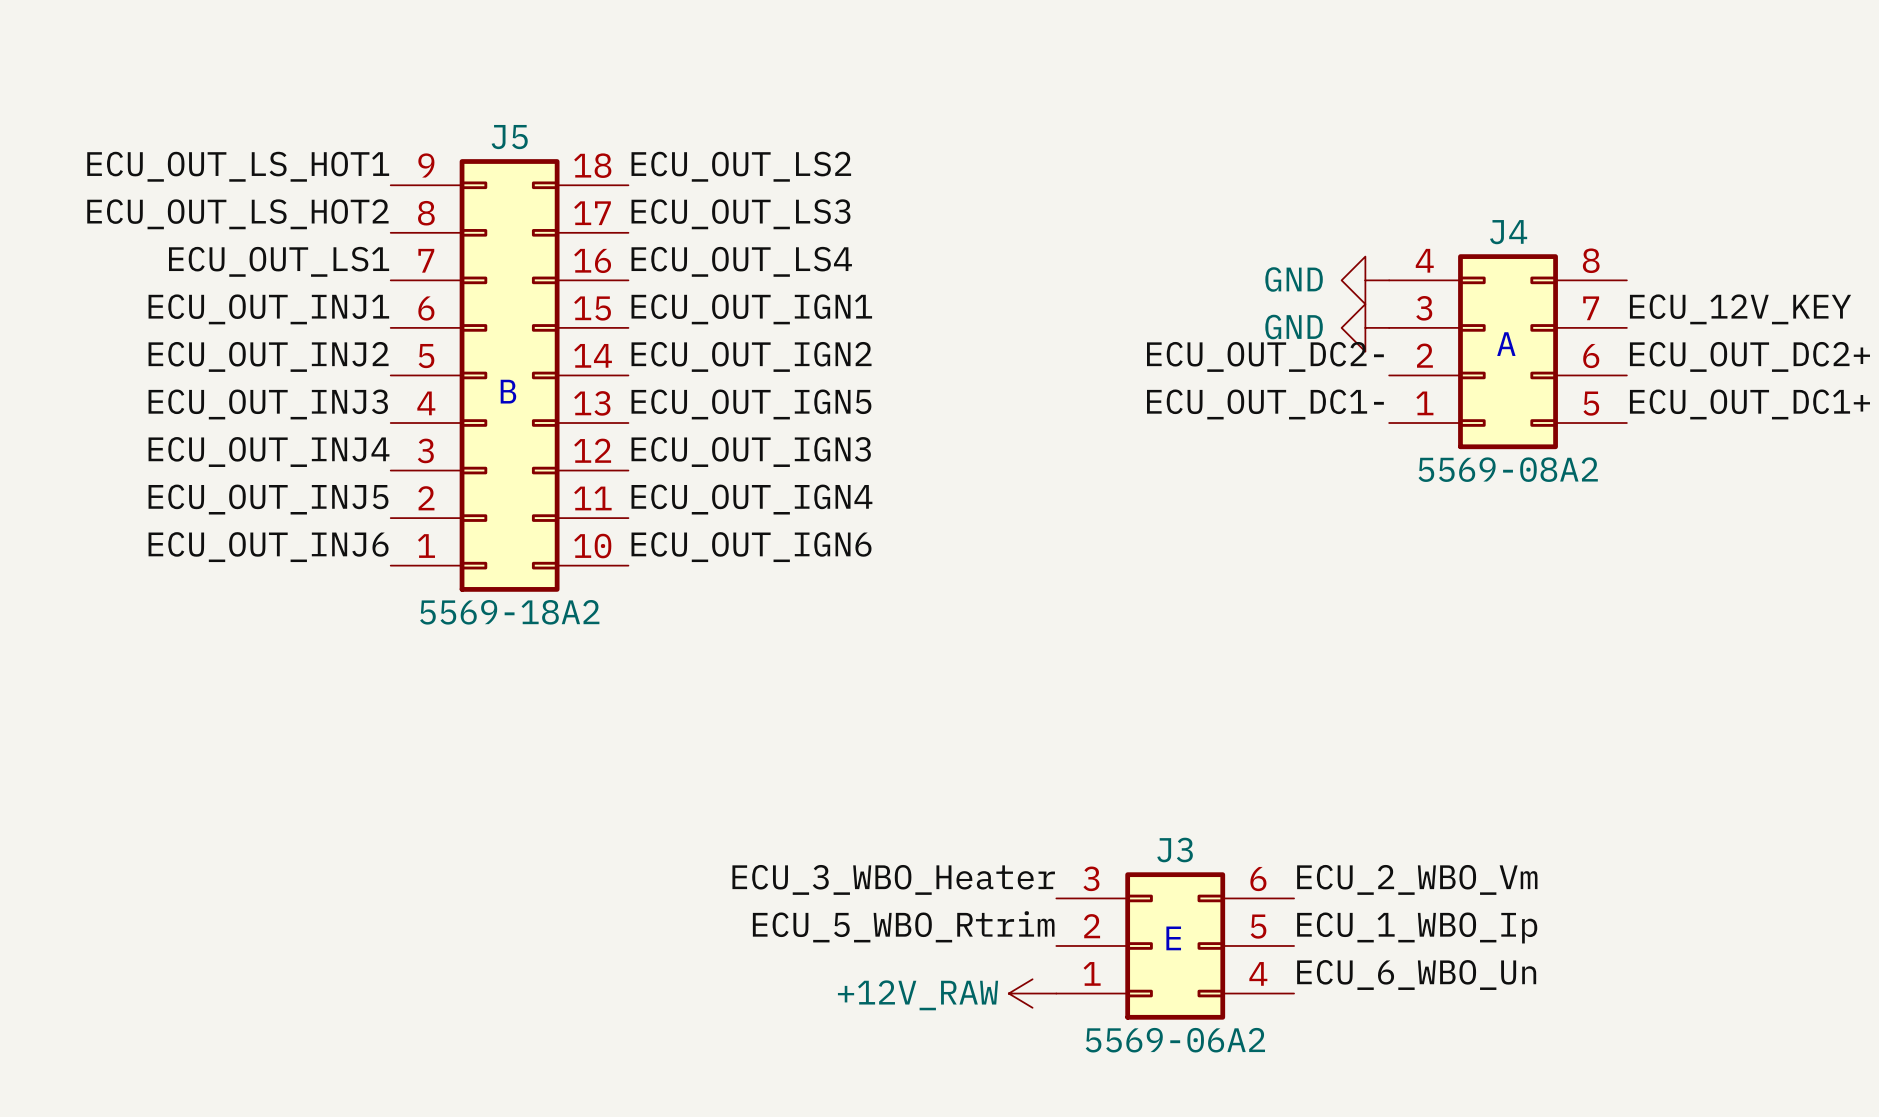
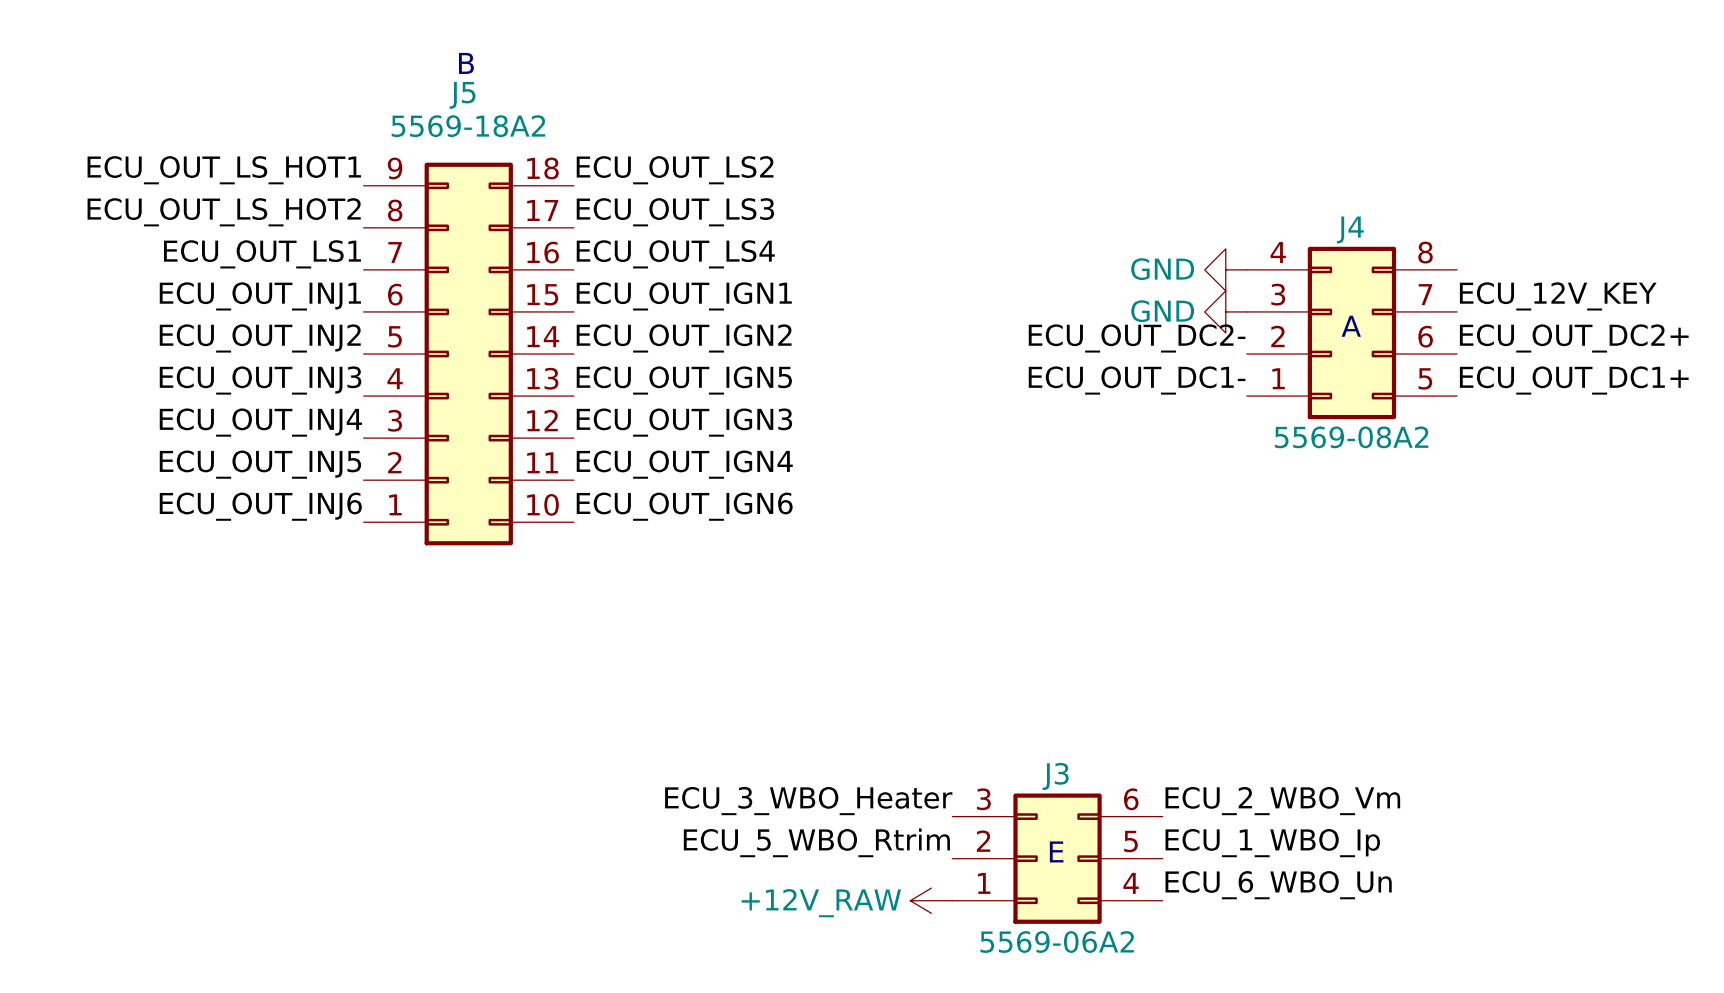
J5 name position: J5 (509, 137) -> J5 (462, 95)
text position: B (508, 391) -> B (466, 63)
J5 value position: 5569-18A2 (509, 612) -> 5569-18A2 (468, 126)

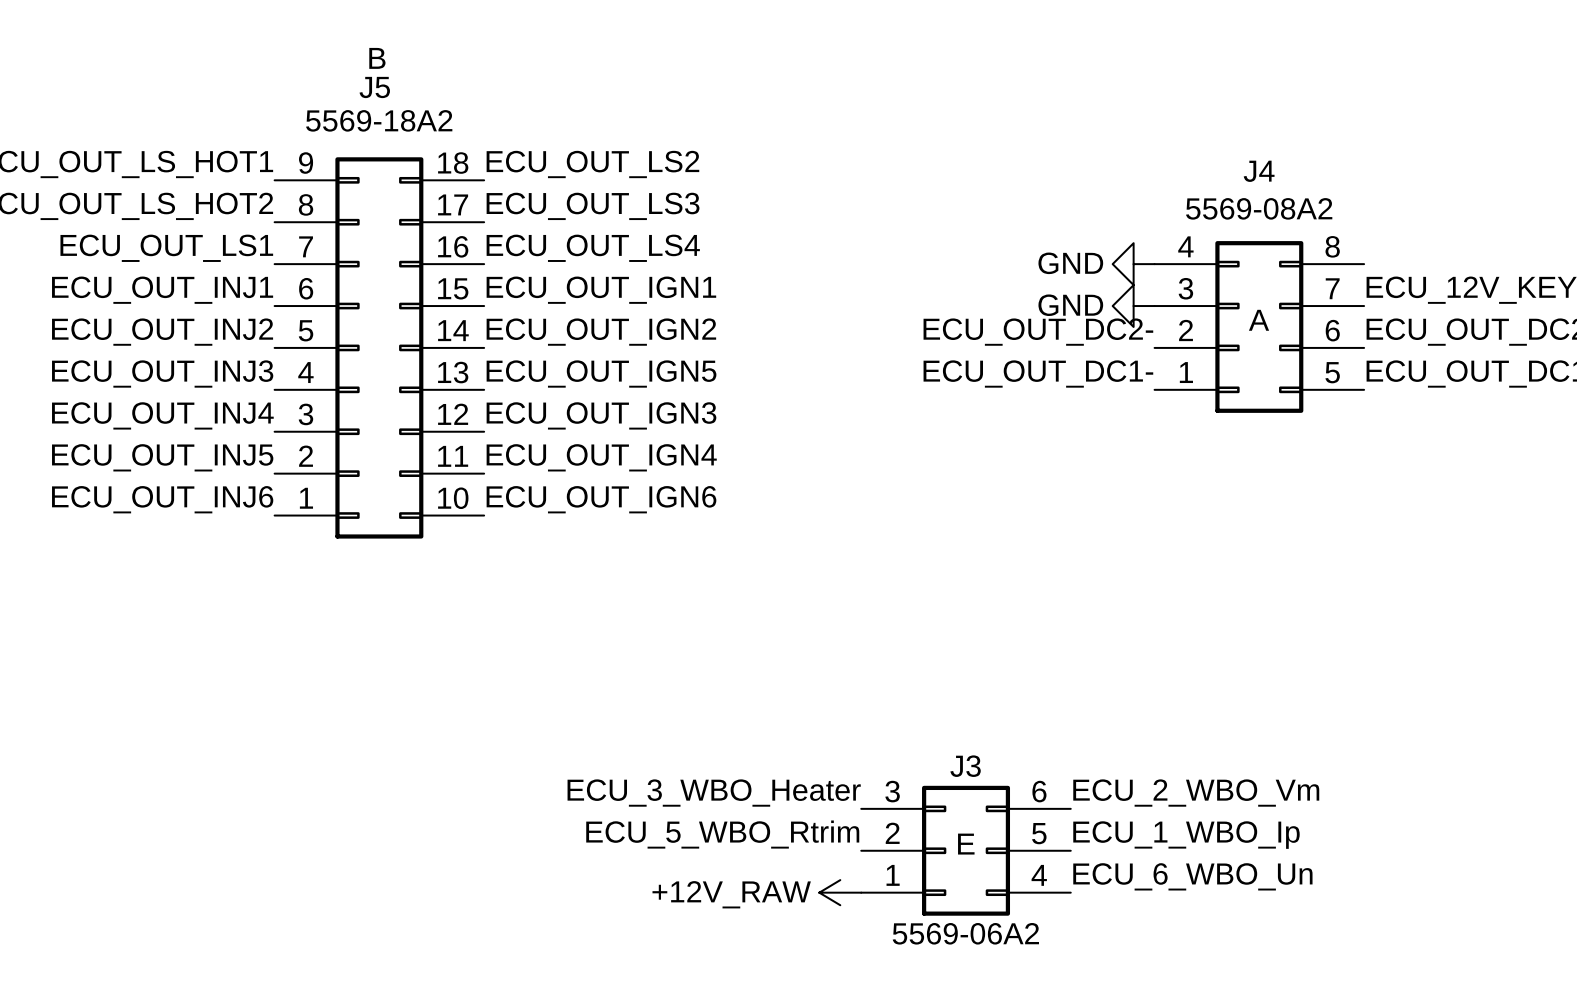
J4 name position: J4 (1350, 229) -> J4 (1259, 171)
J4 value position: 5569-08A2 (1351, 437) -> 5569-08A2 (1259, 208)

